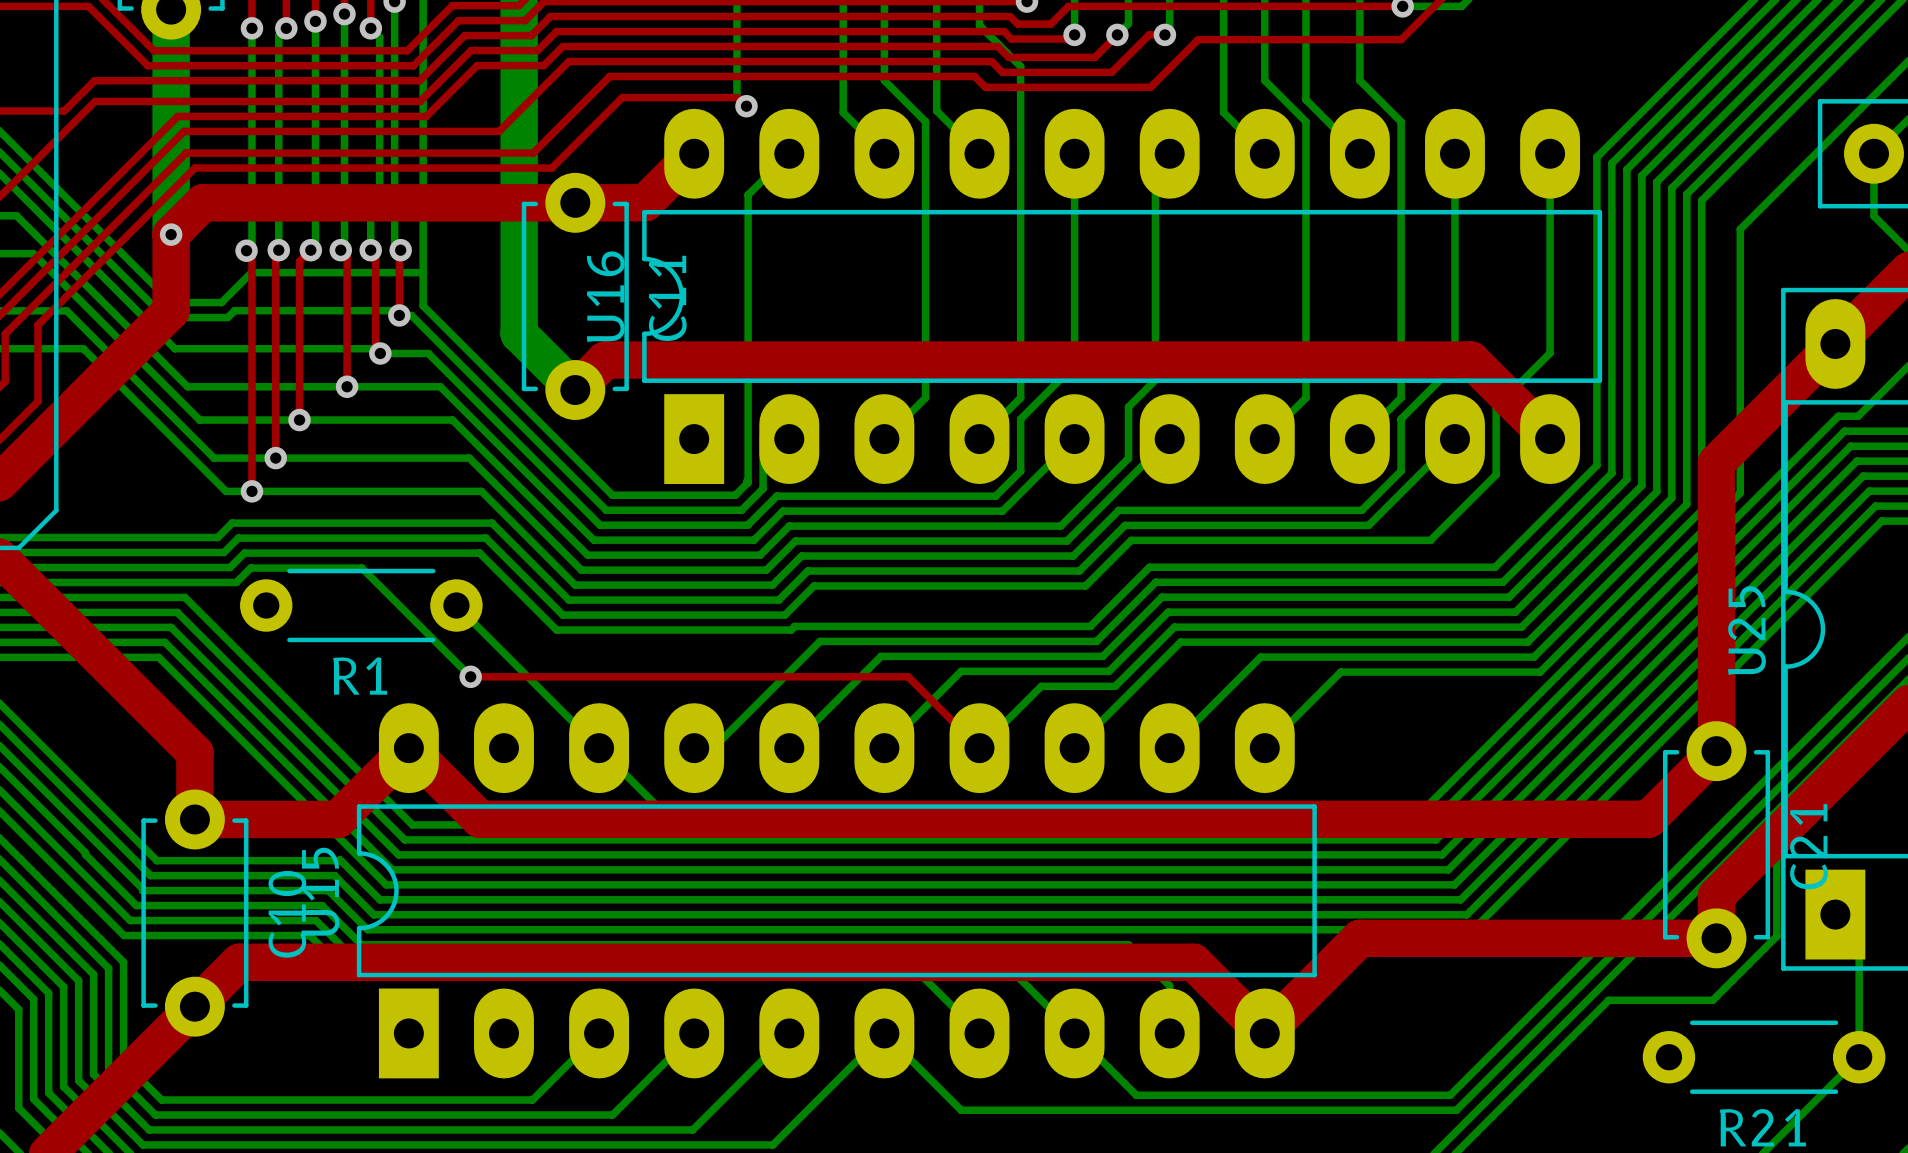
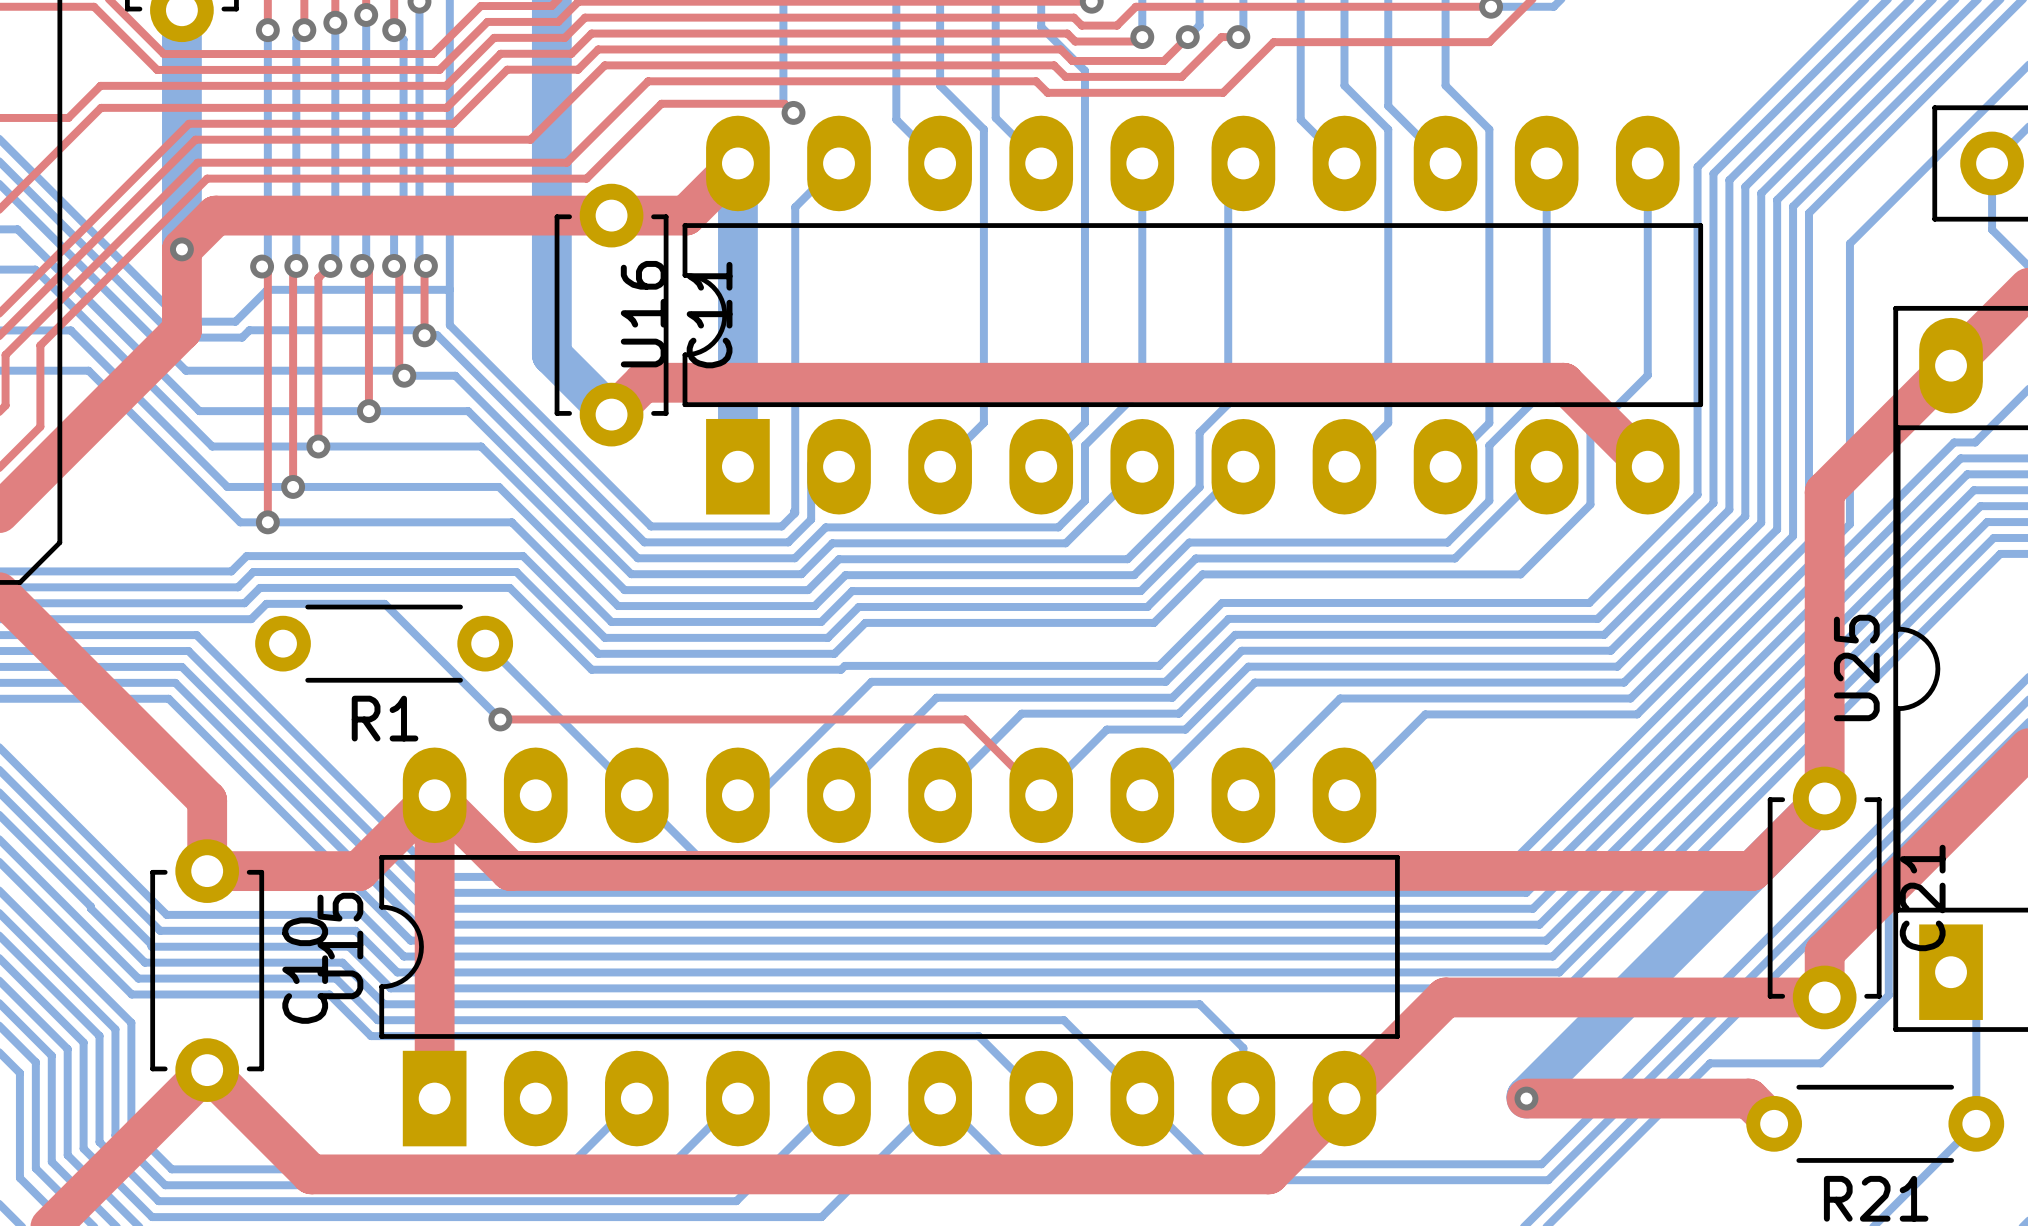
bottom track: none -> (737, 163) (737, 466)
top track: none -> (434, 795) (434, 1098)
bottom track: none -> (1824, 798) (1526, 1098)
top track: (194, 1006) (239, 962) (1193, 962) (1264, 1033) -> (207, 1070) (311, 1174) (1268, 1174) (1344, 1098)
top track: none -> (1526, 1098) (1748, 1098) (1774, 1123)
via: none -> (1526, 1098)

